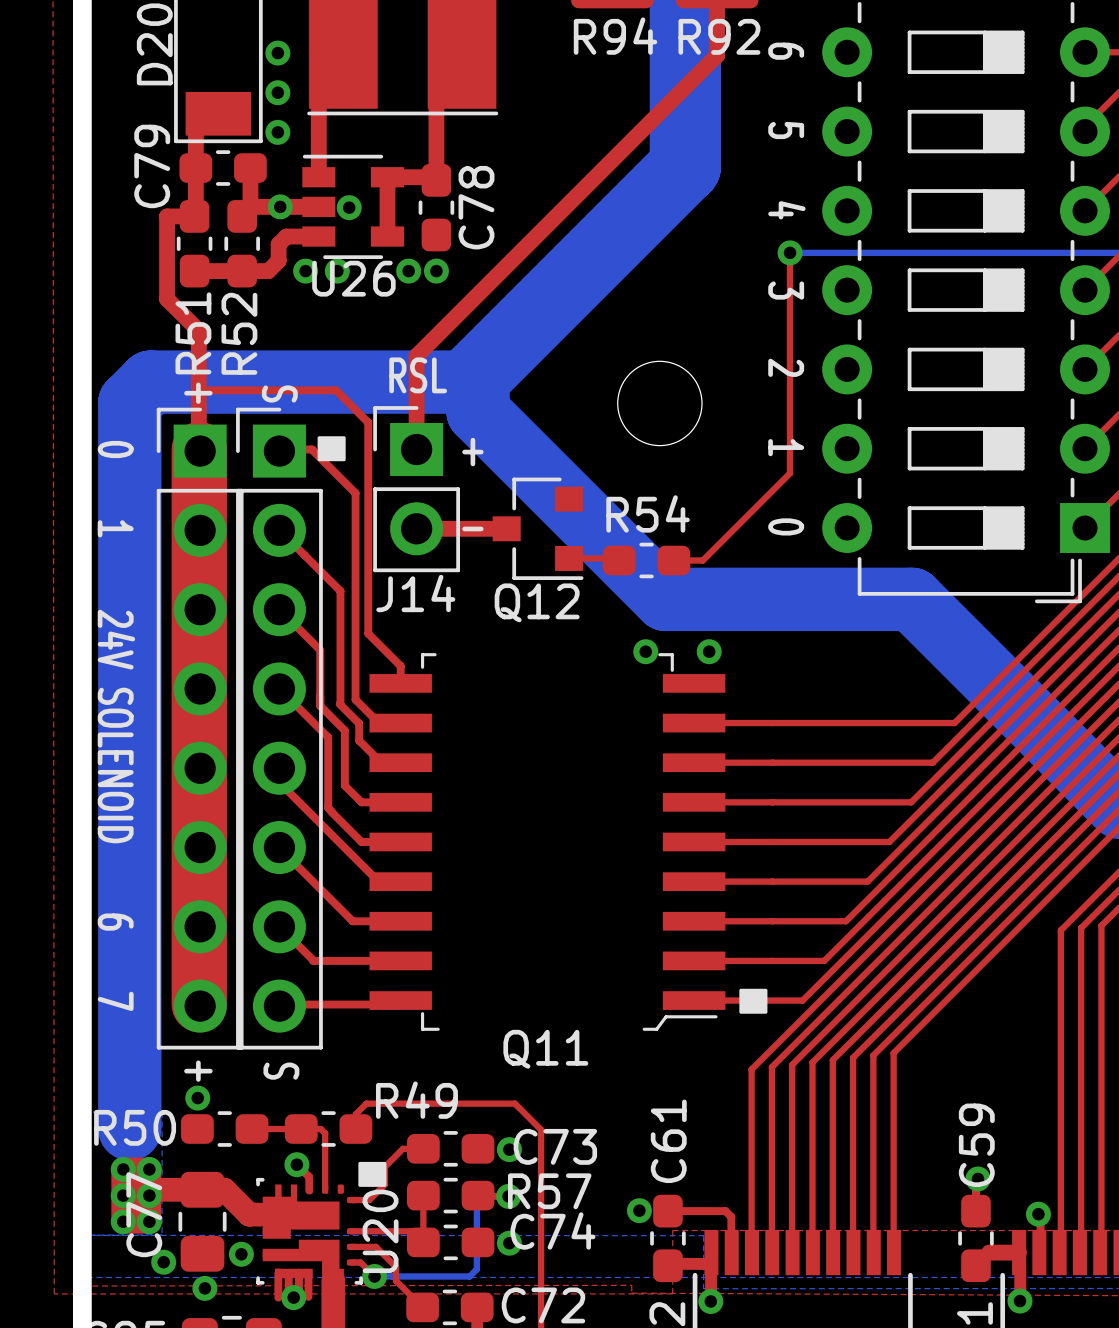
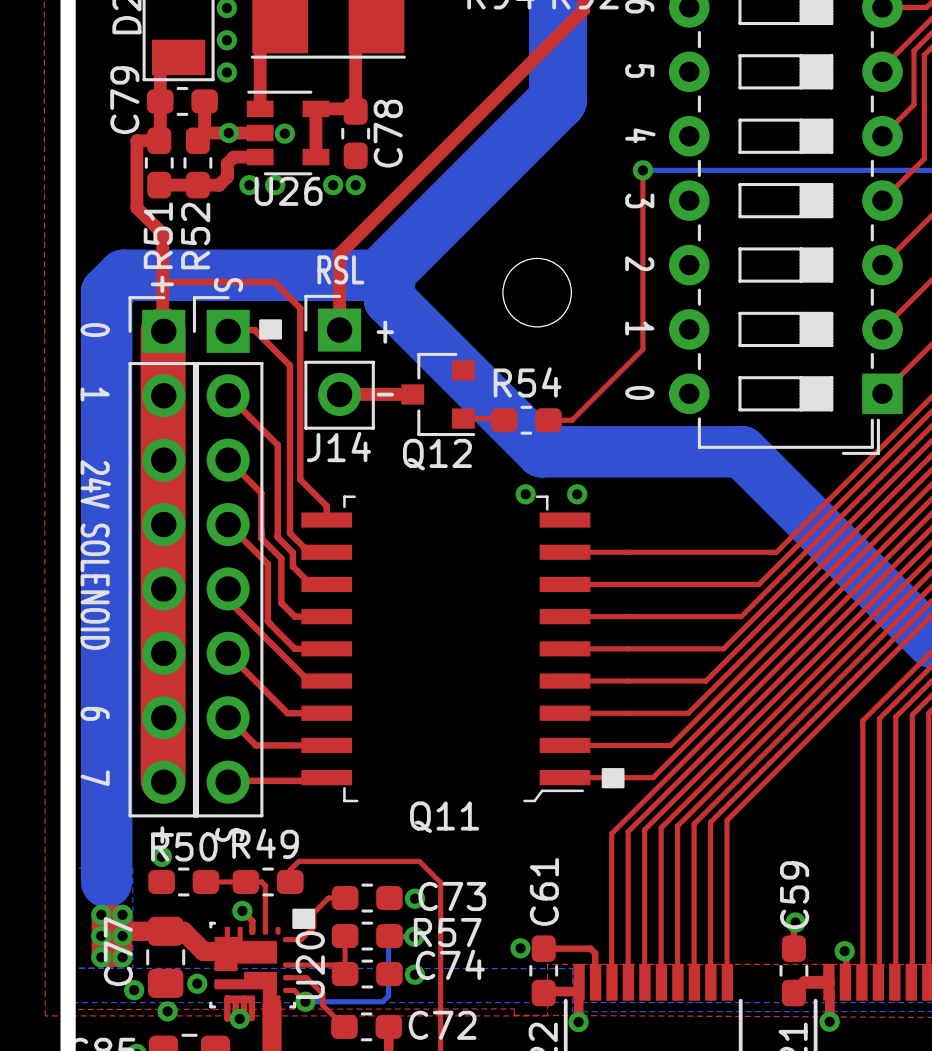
R49 name position: R49 (416, 1100) -> R49 (265, 843)
R50 name position: R50 (135, 1127) -> R50 (184, 846)

